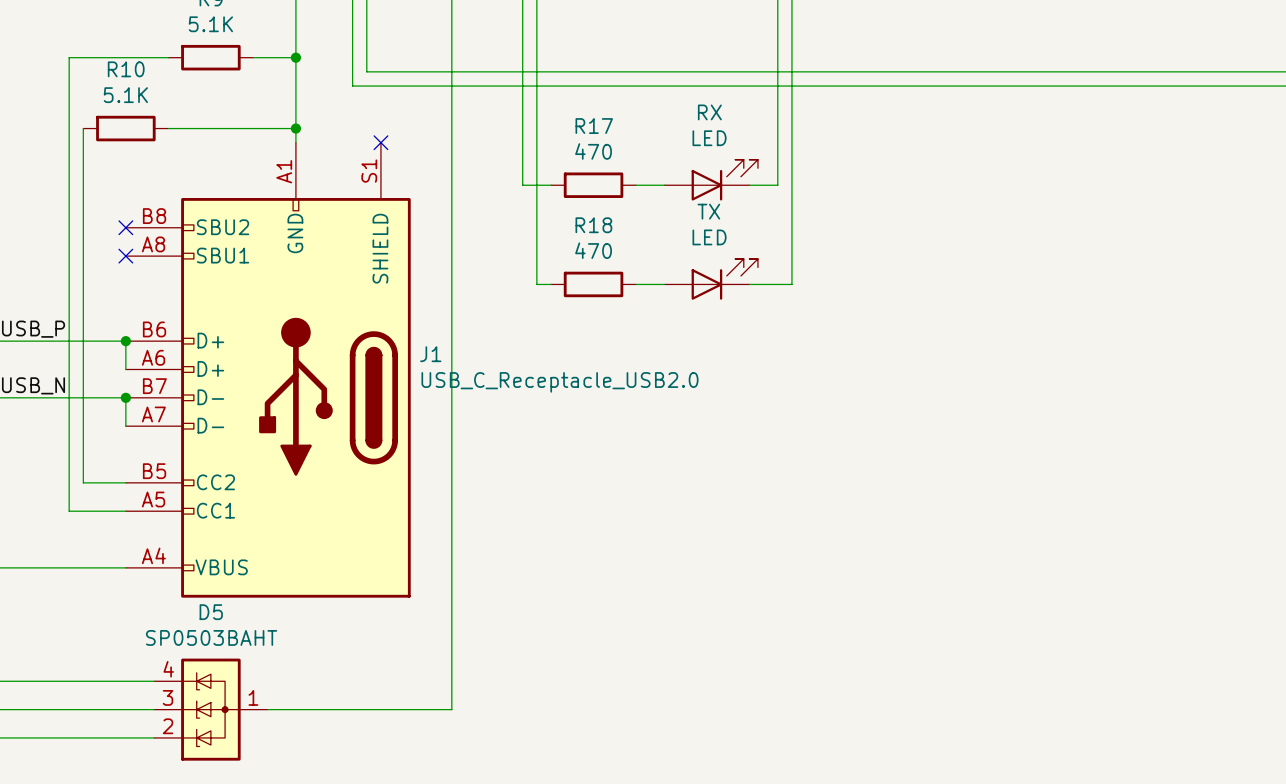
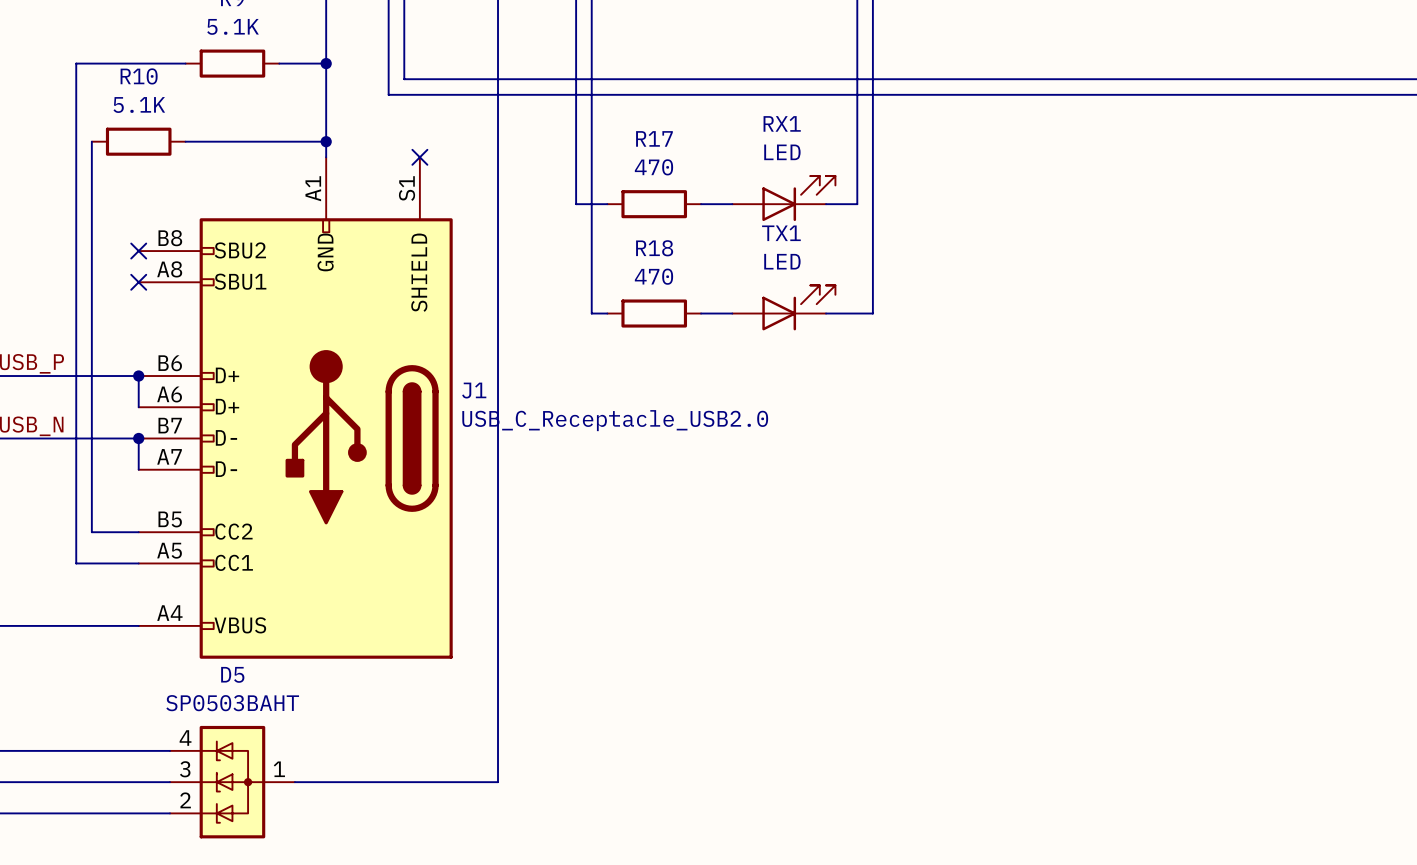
RX name: RX (709, 112) -> RX1 (782, 123)
TX name: TX (708, 211) -> TX1 (781, 233)

